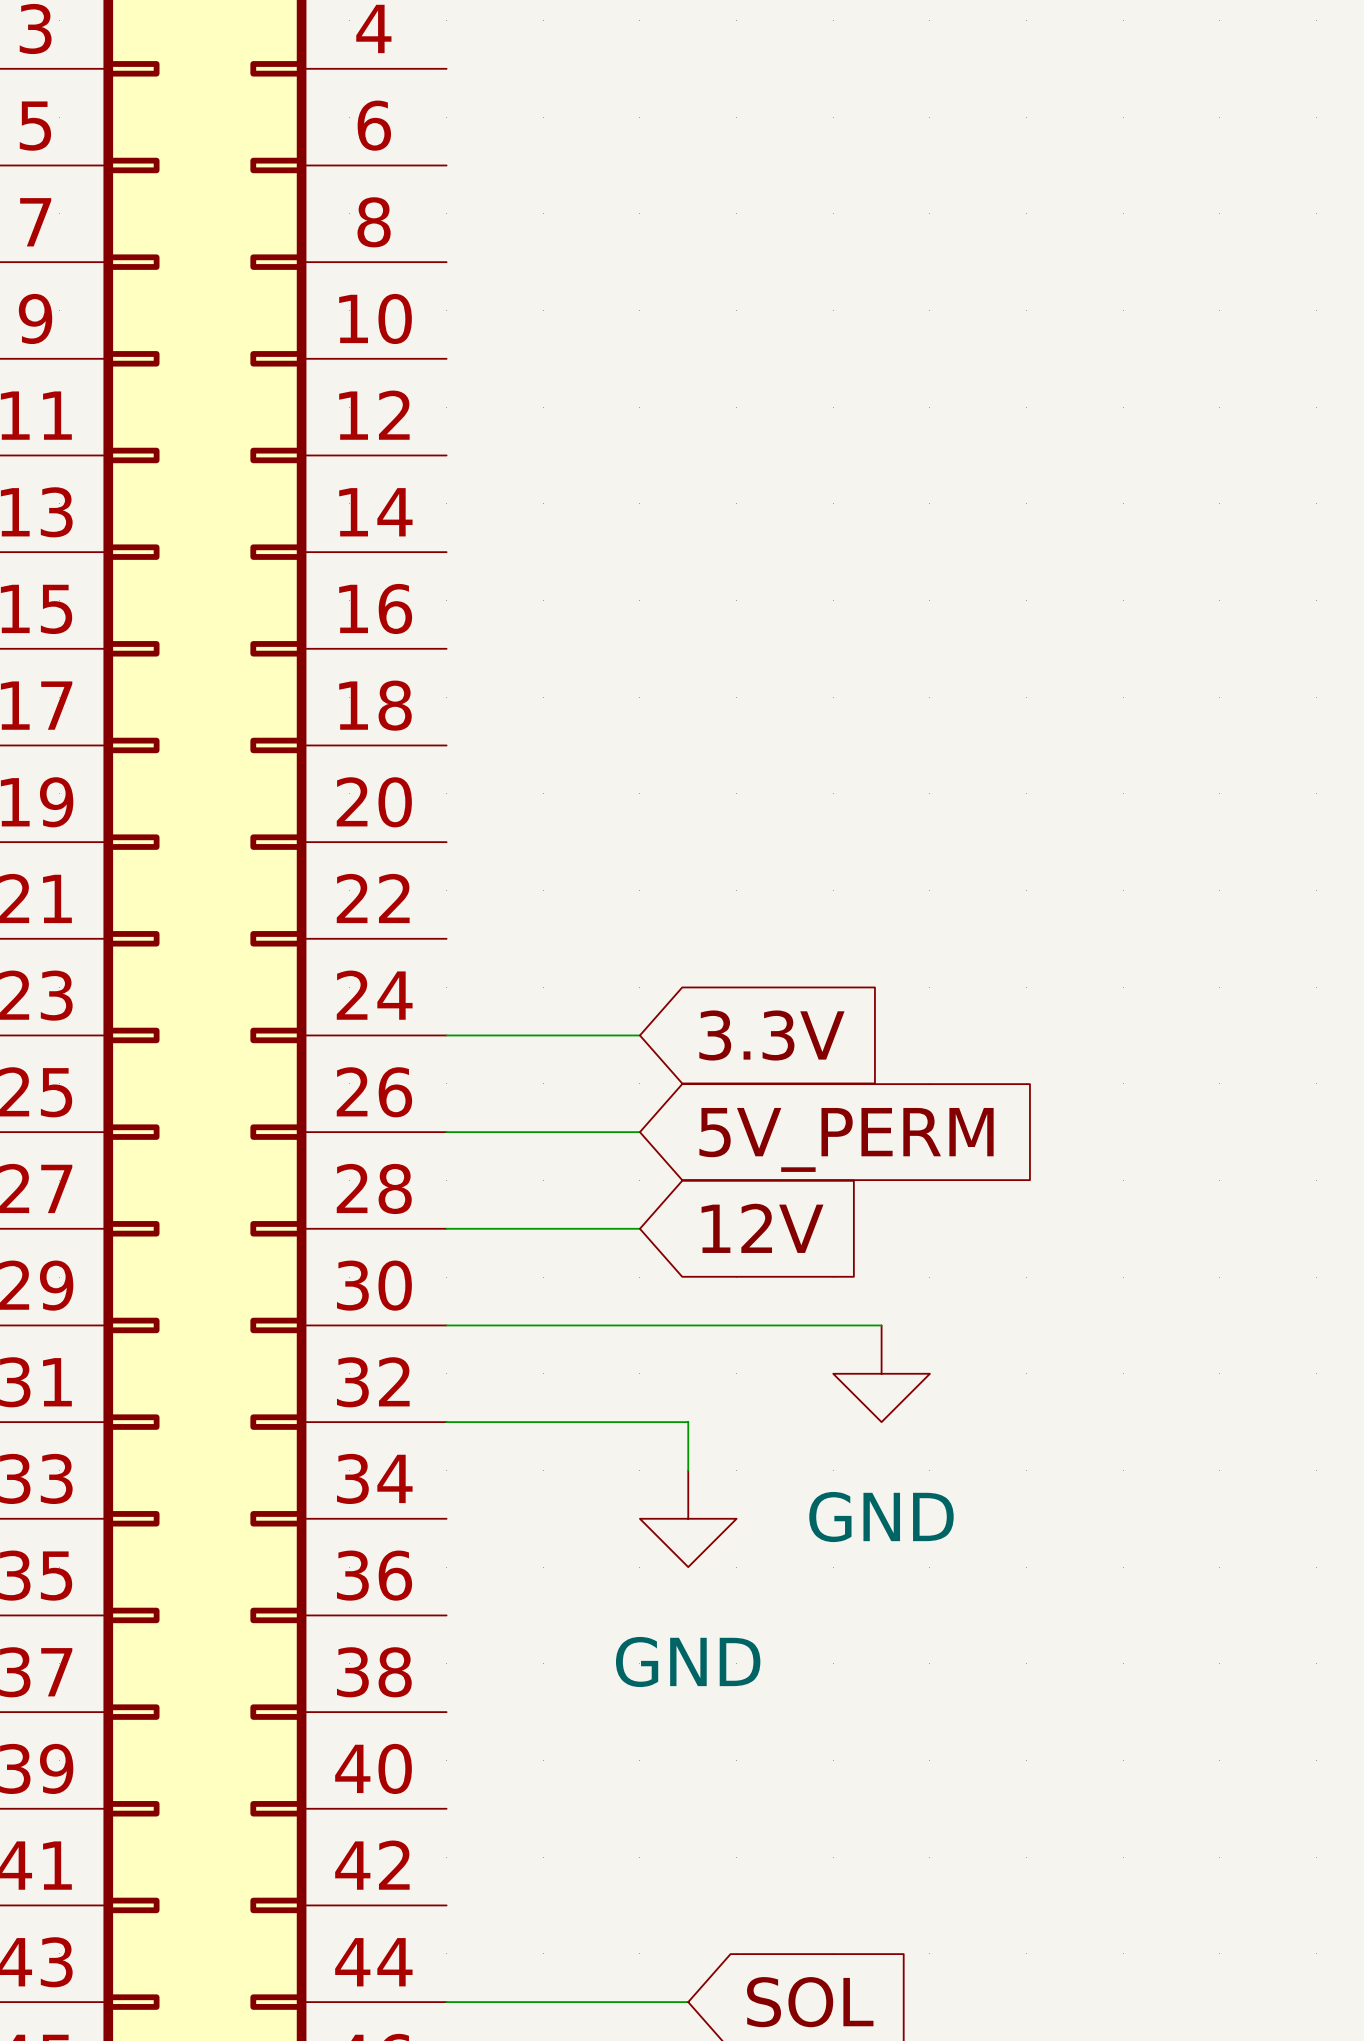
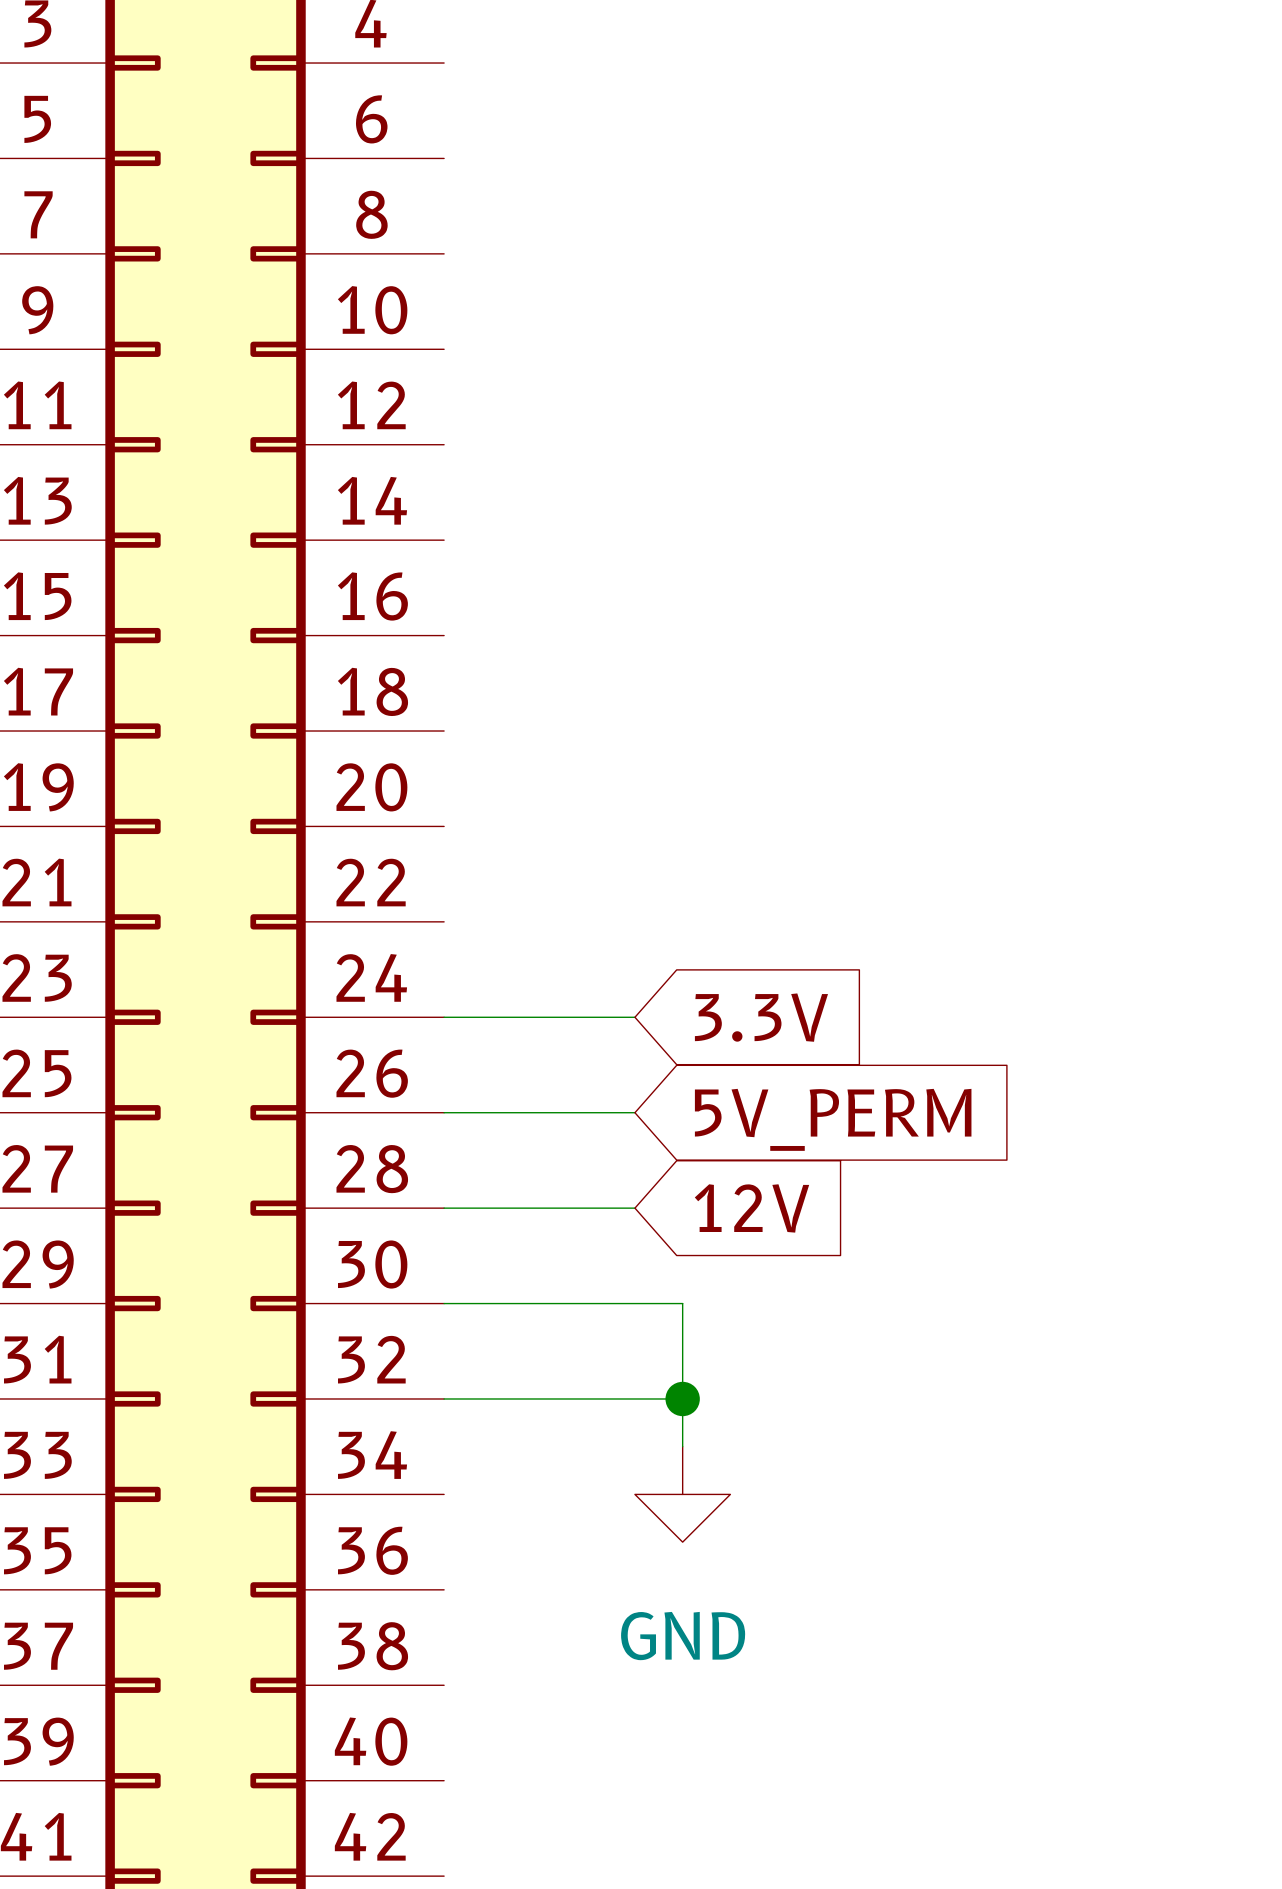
wire: (688, 1325) (881, 1325) -> (682, 1303) (682, 1398)
power symbol: GND (881, 1373) -> none
junction: none -> (682, 1398)

